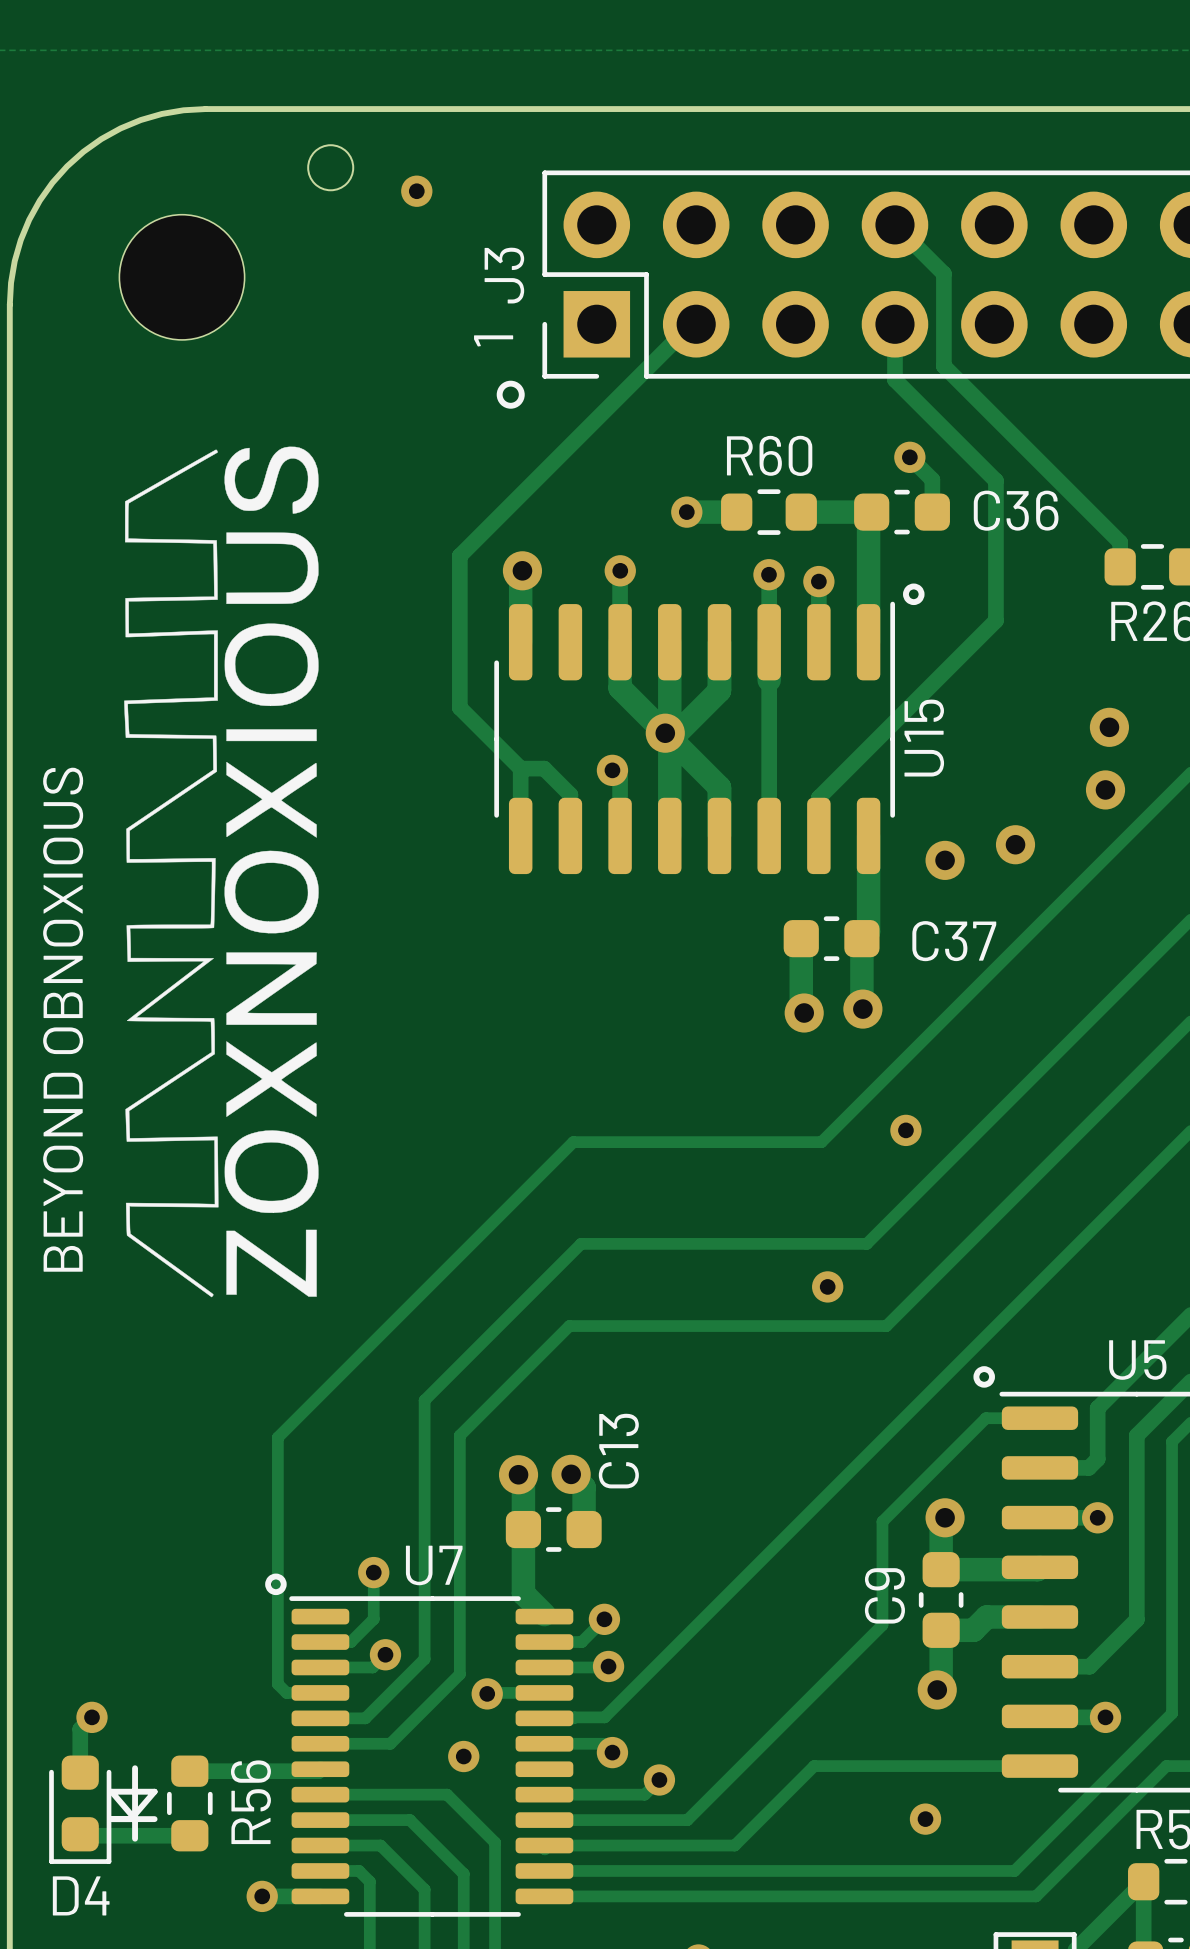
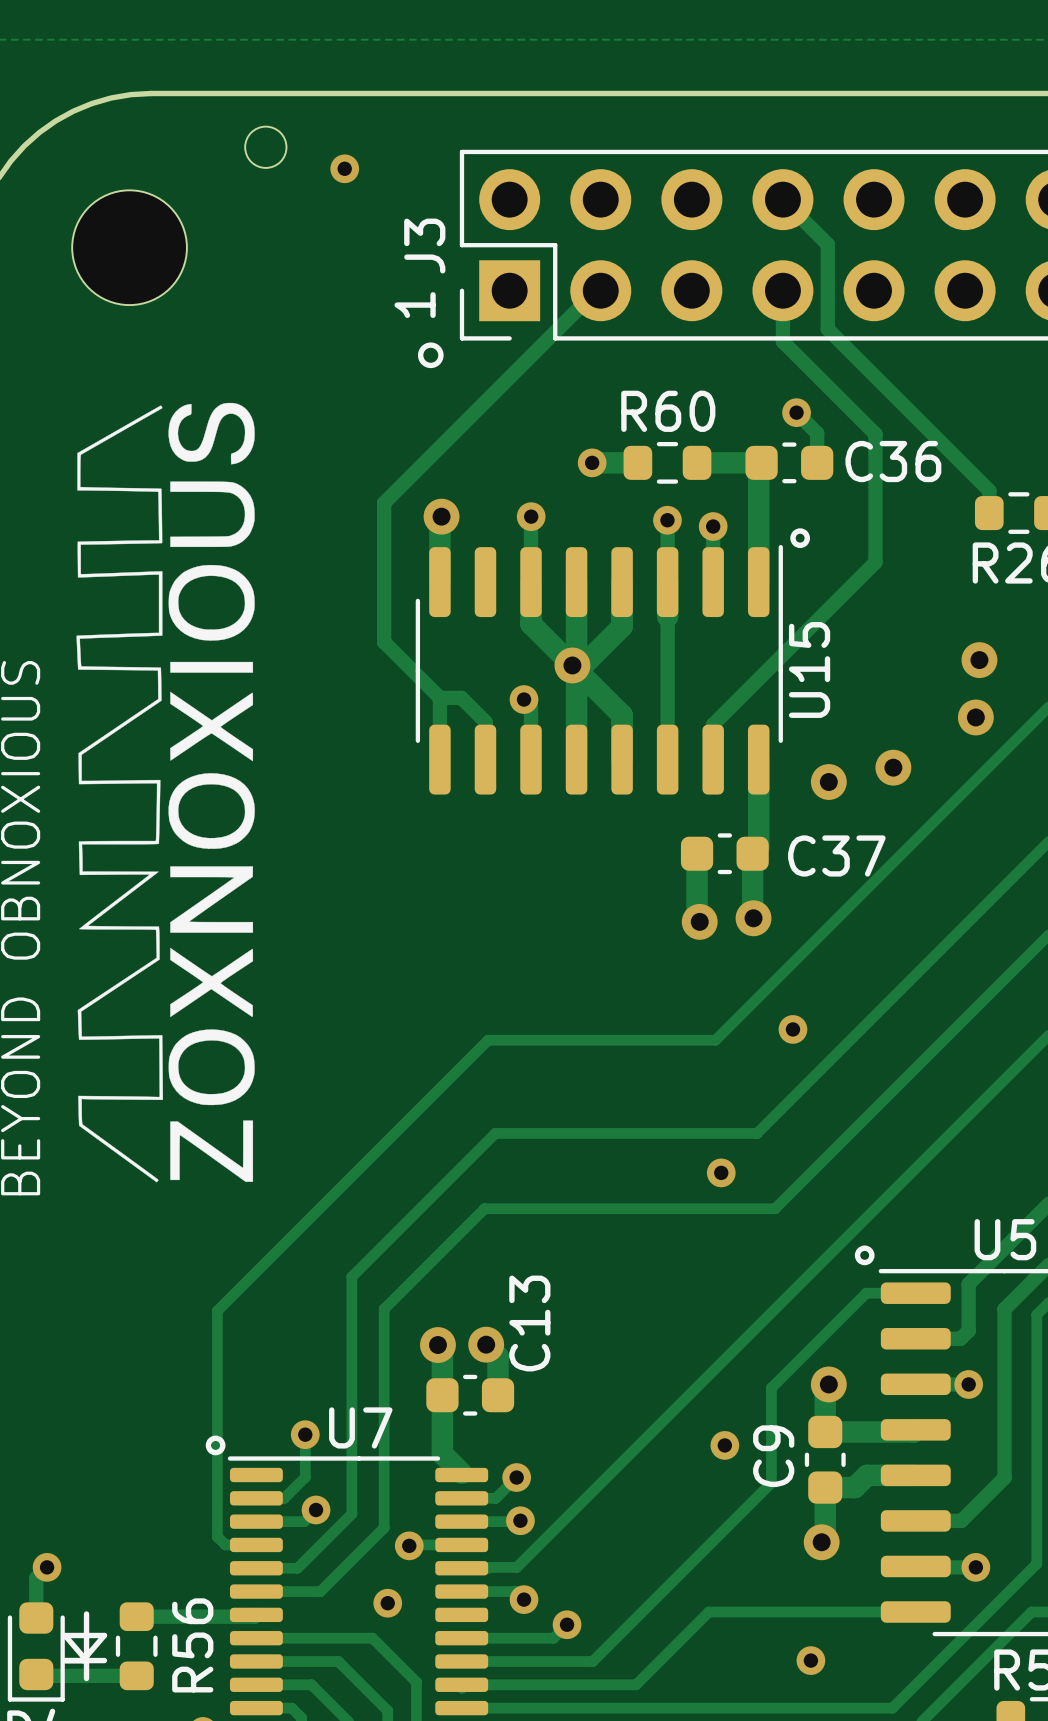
via: none -> (724, 1445)

